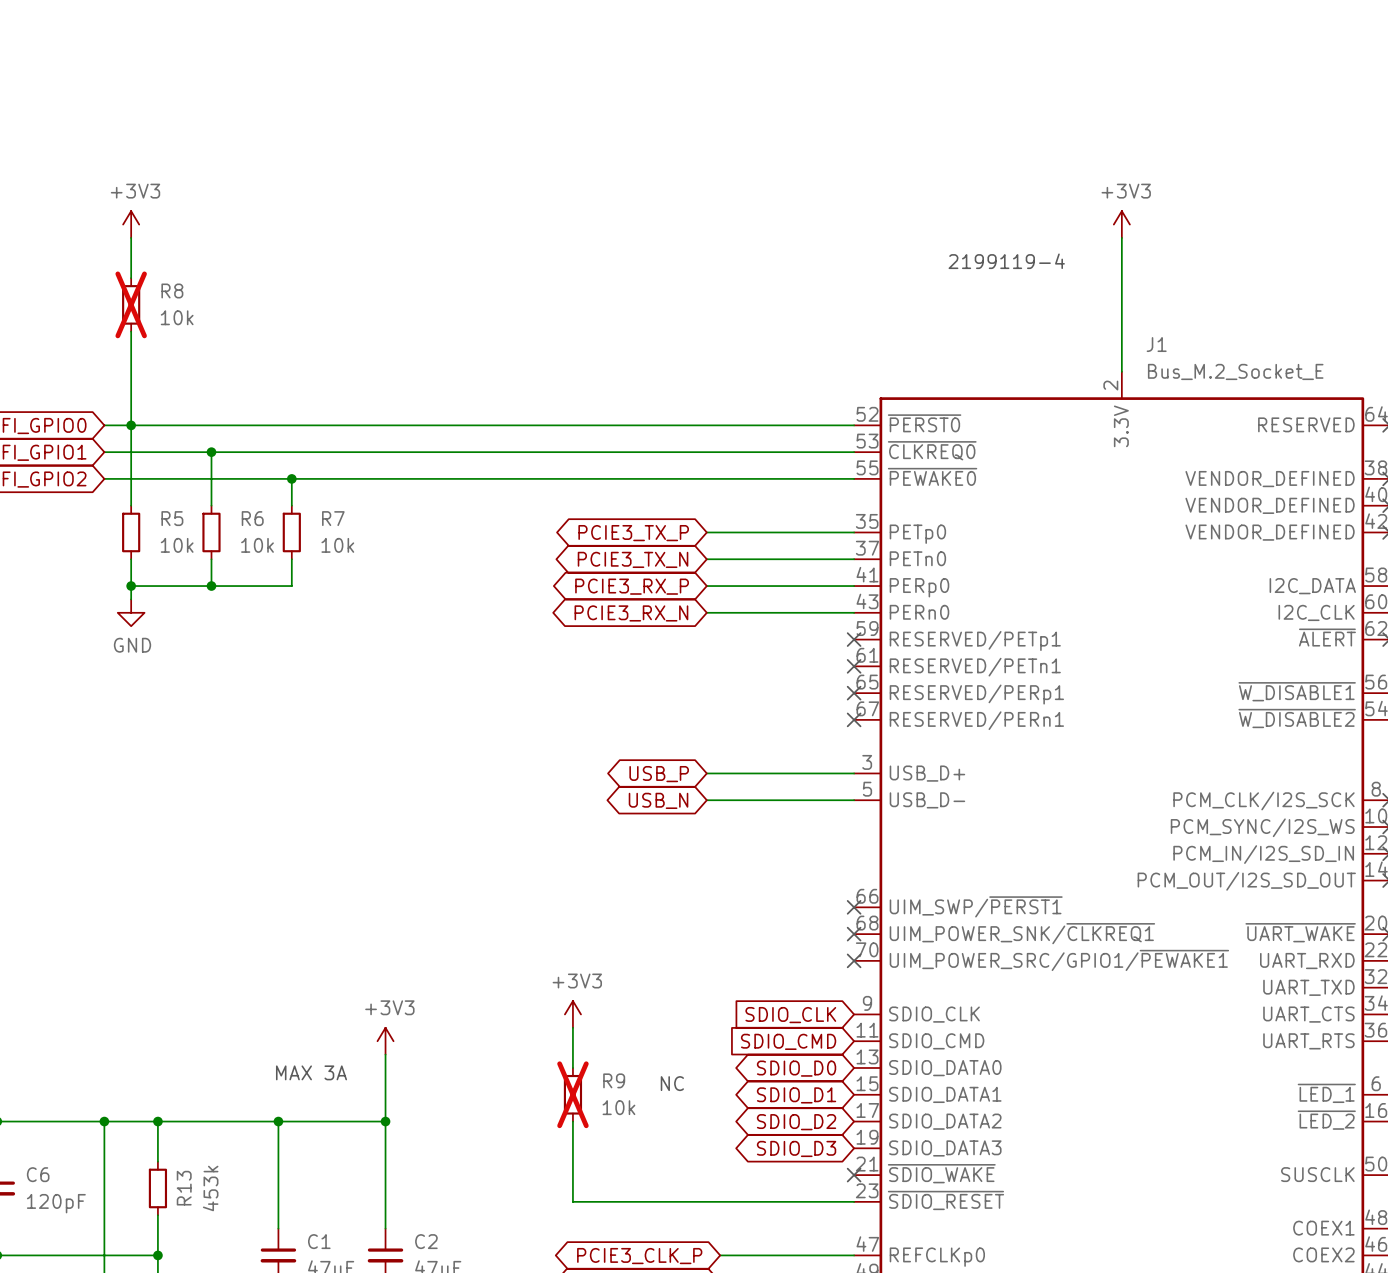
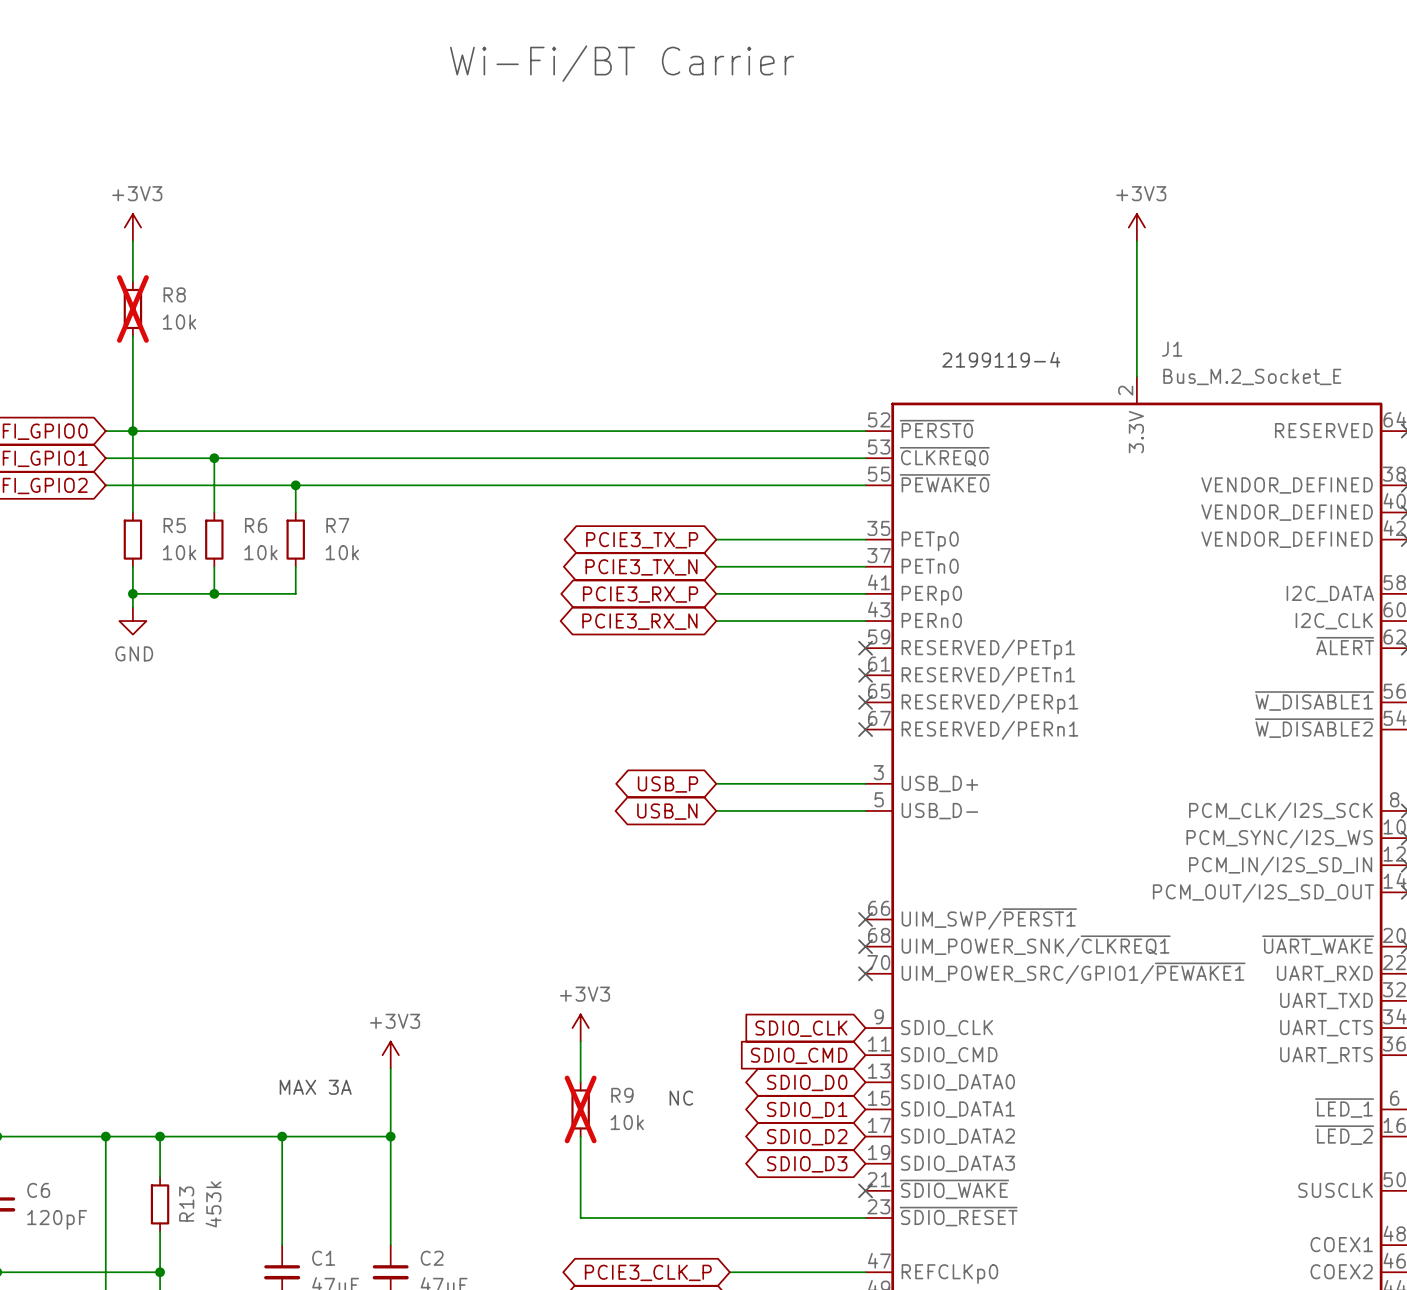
text: none -> Wi-Fi/BT Carrier (621, 63)
text position: 2199119-4 (1006, 261) -> 2199119-4 (1001, 359)

